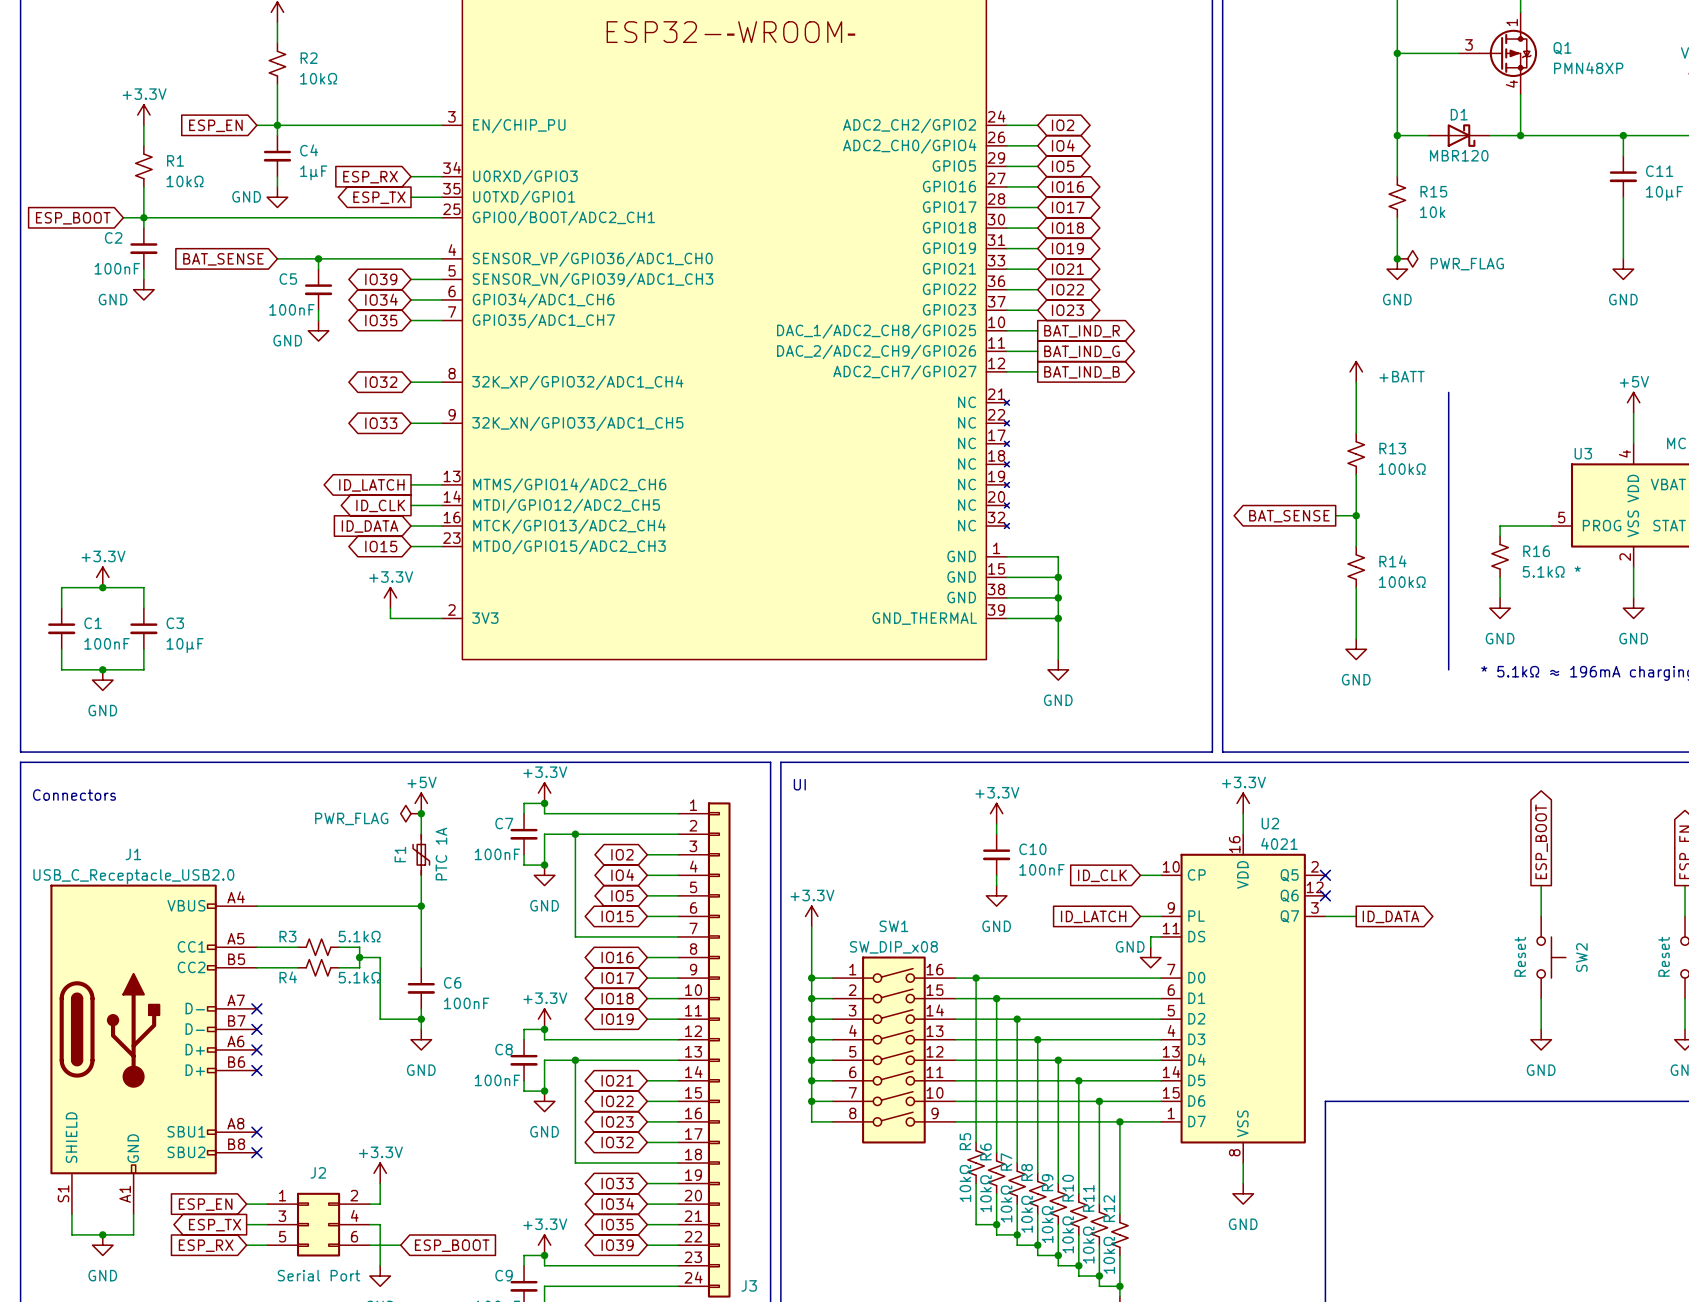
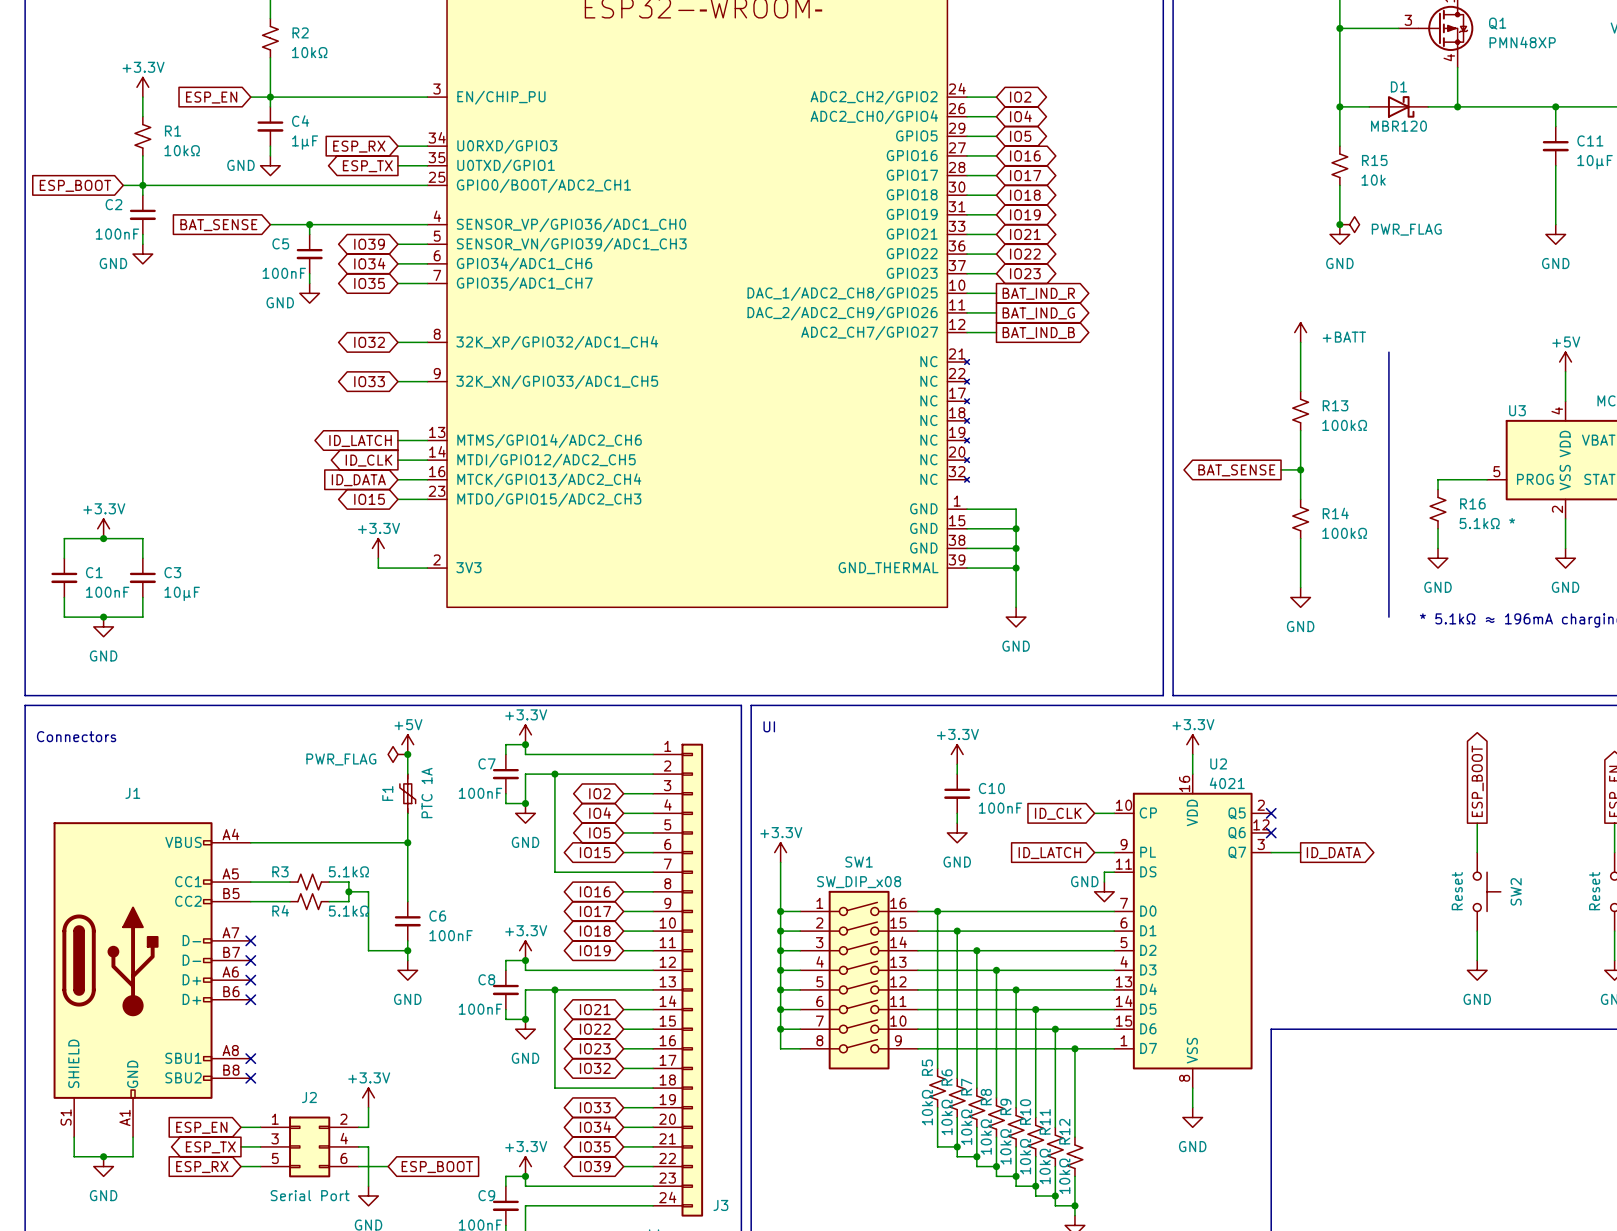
J1 value: USB_C_Receptacle_USB2.0 (133, 876) -> none

